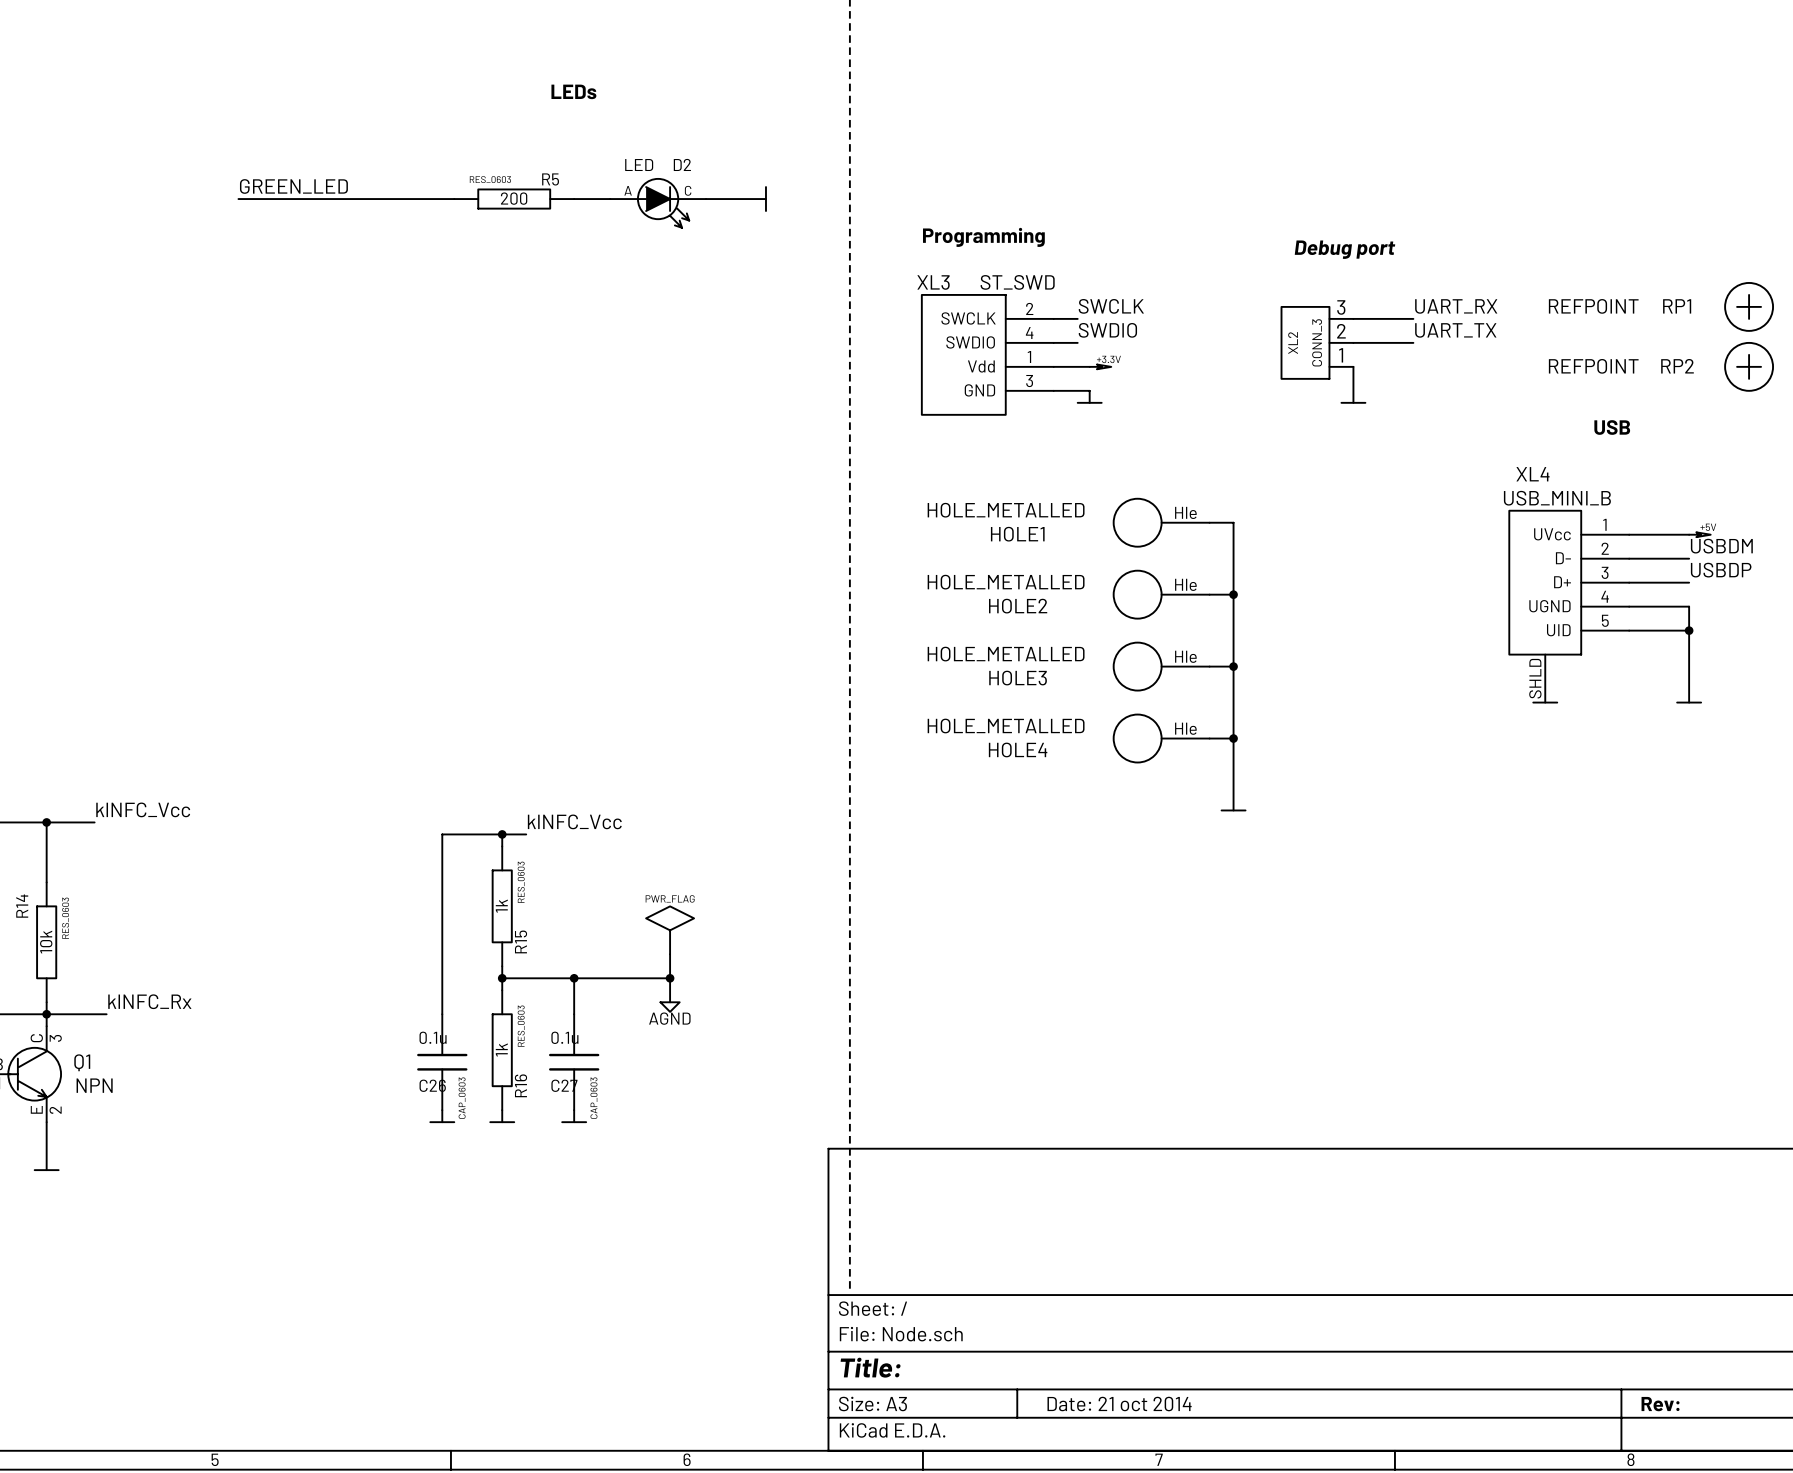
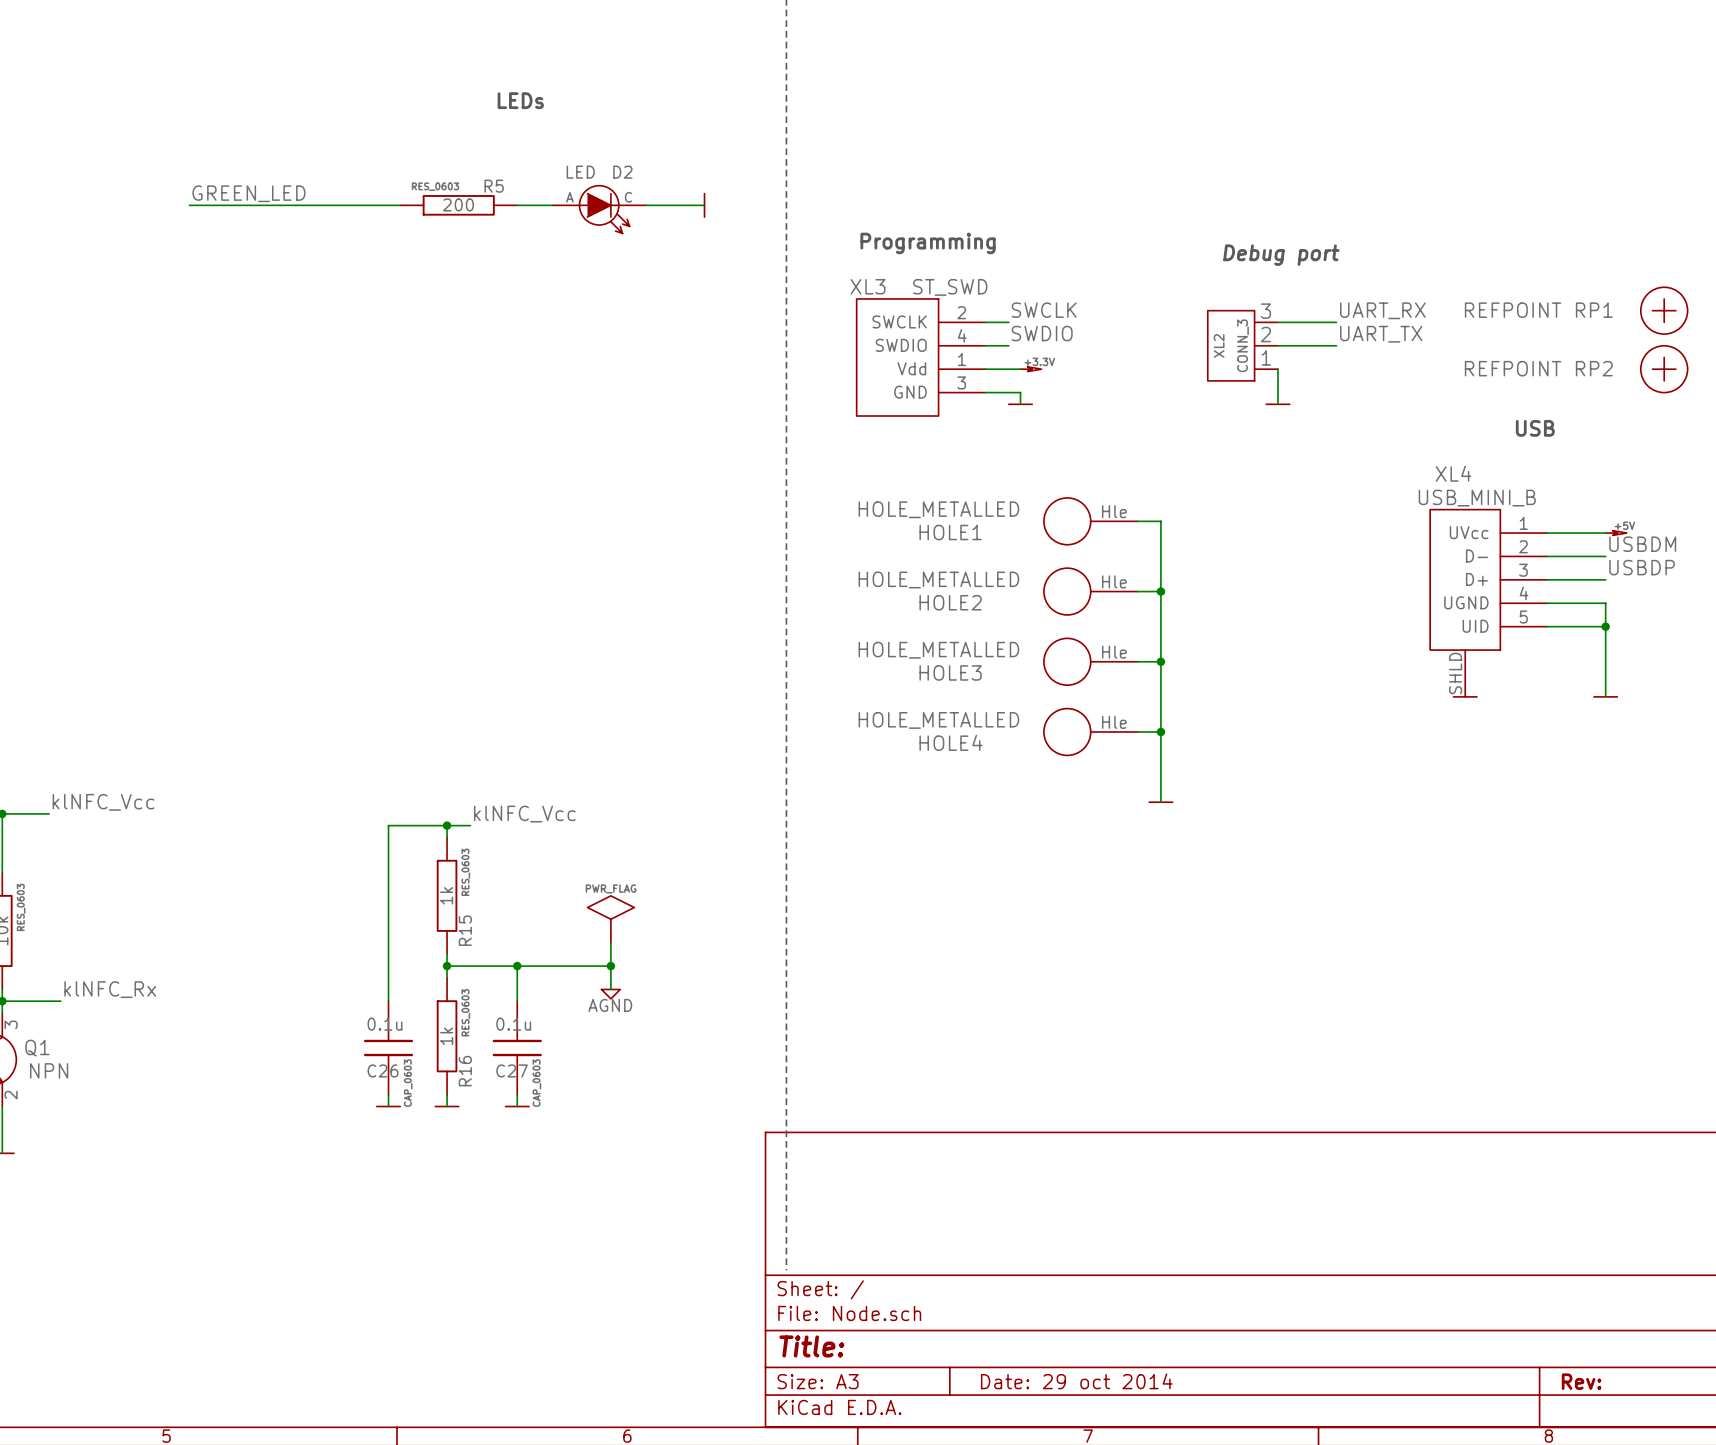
title block: Date: 21 oct 2014 (1119, 1404) -> Date: 29 oct 2014 (1076, 1381)

